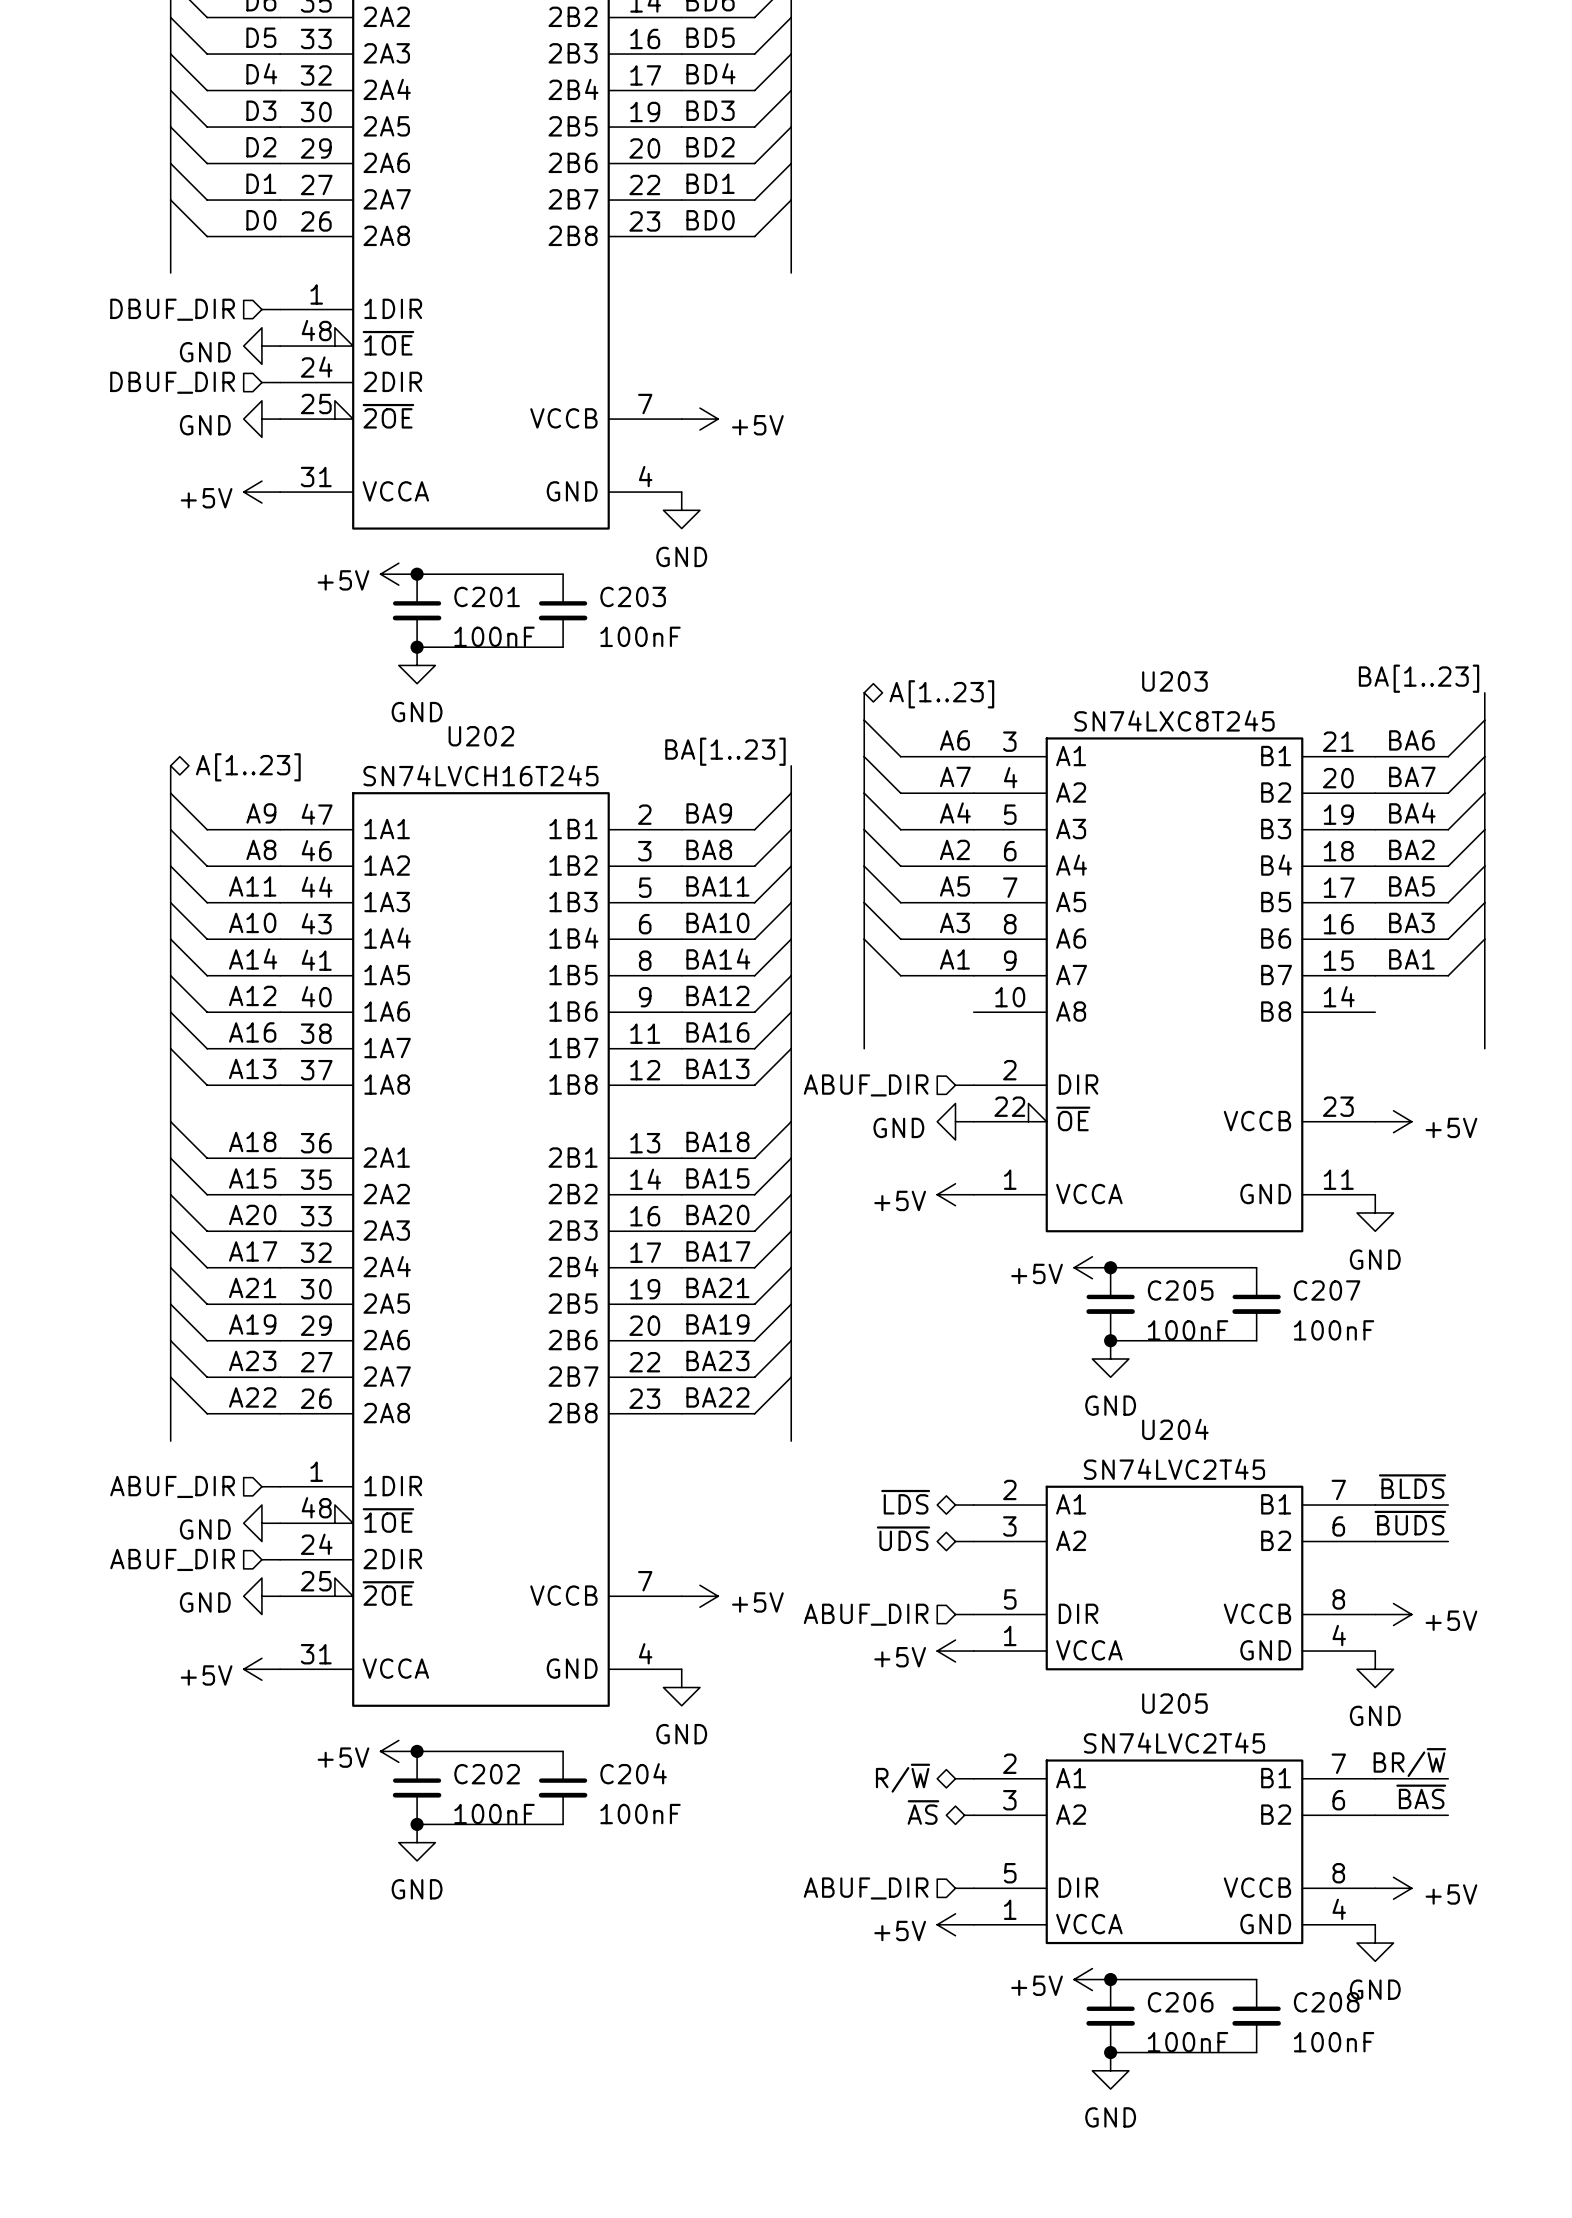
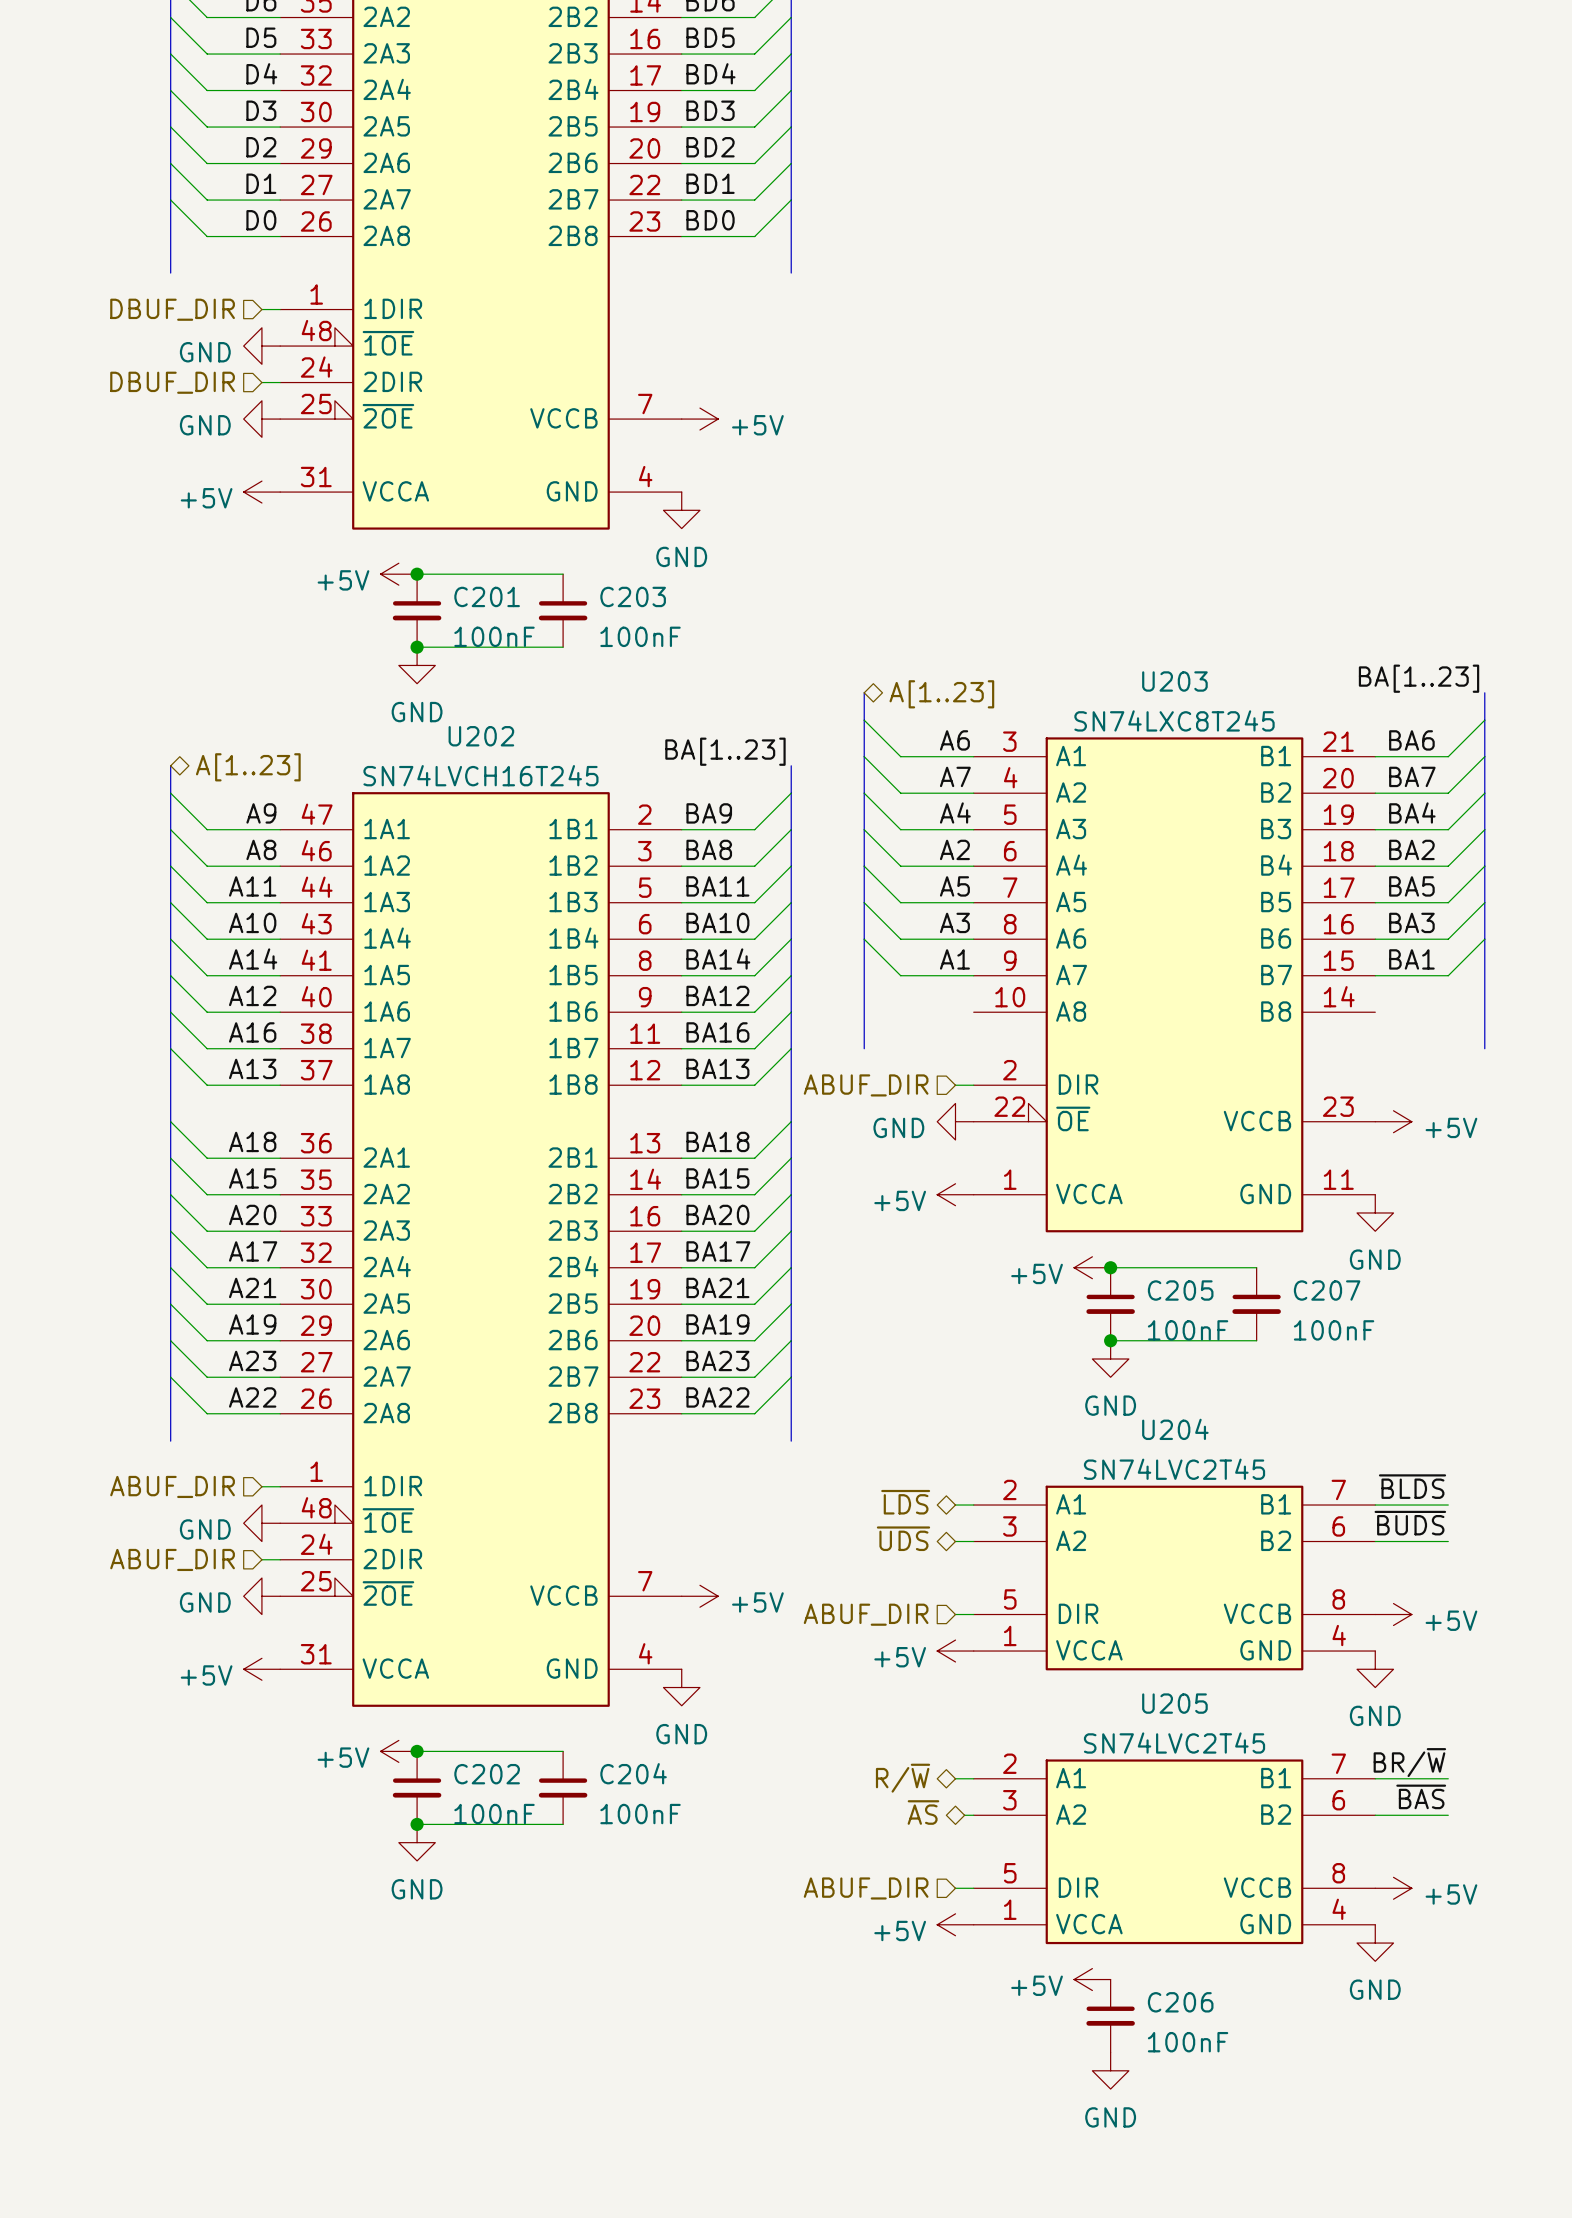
wire: (1110, 1979) (1256, 1979) -> none
junction: (1110, 1979) -> none
C208: 100nF (1256, 2016) -> none
wire: (1110, 2052) (1256, 2052) -> none
junction: (1110, 2052) -> none

